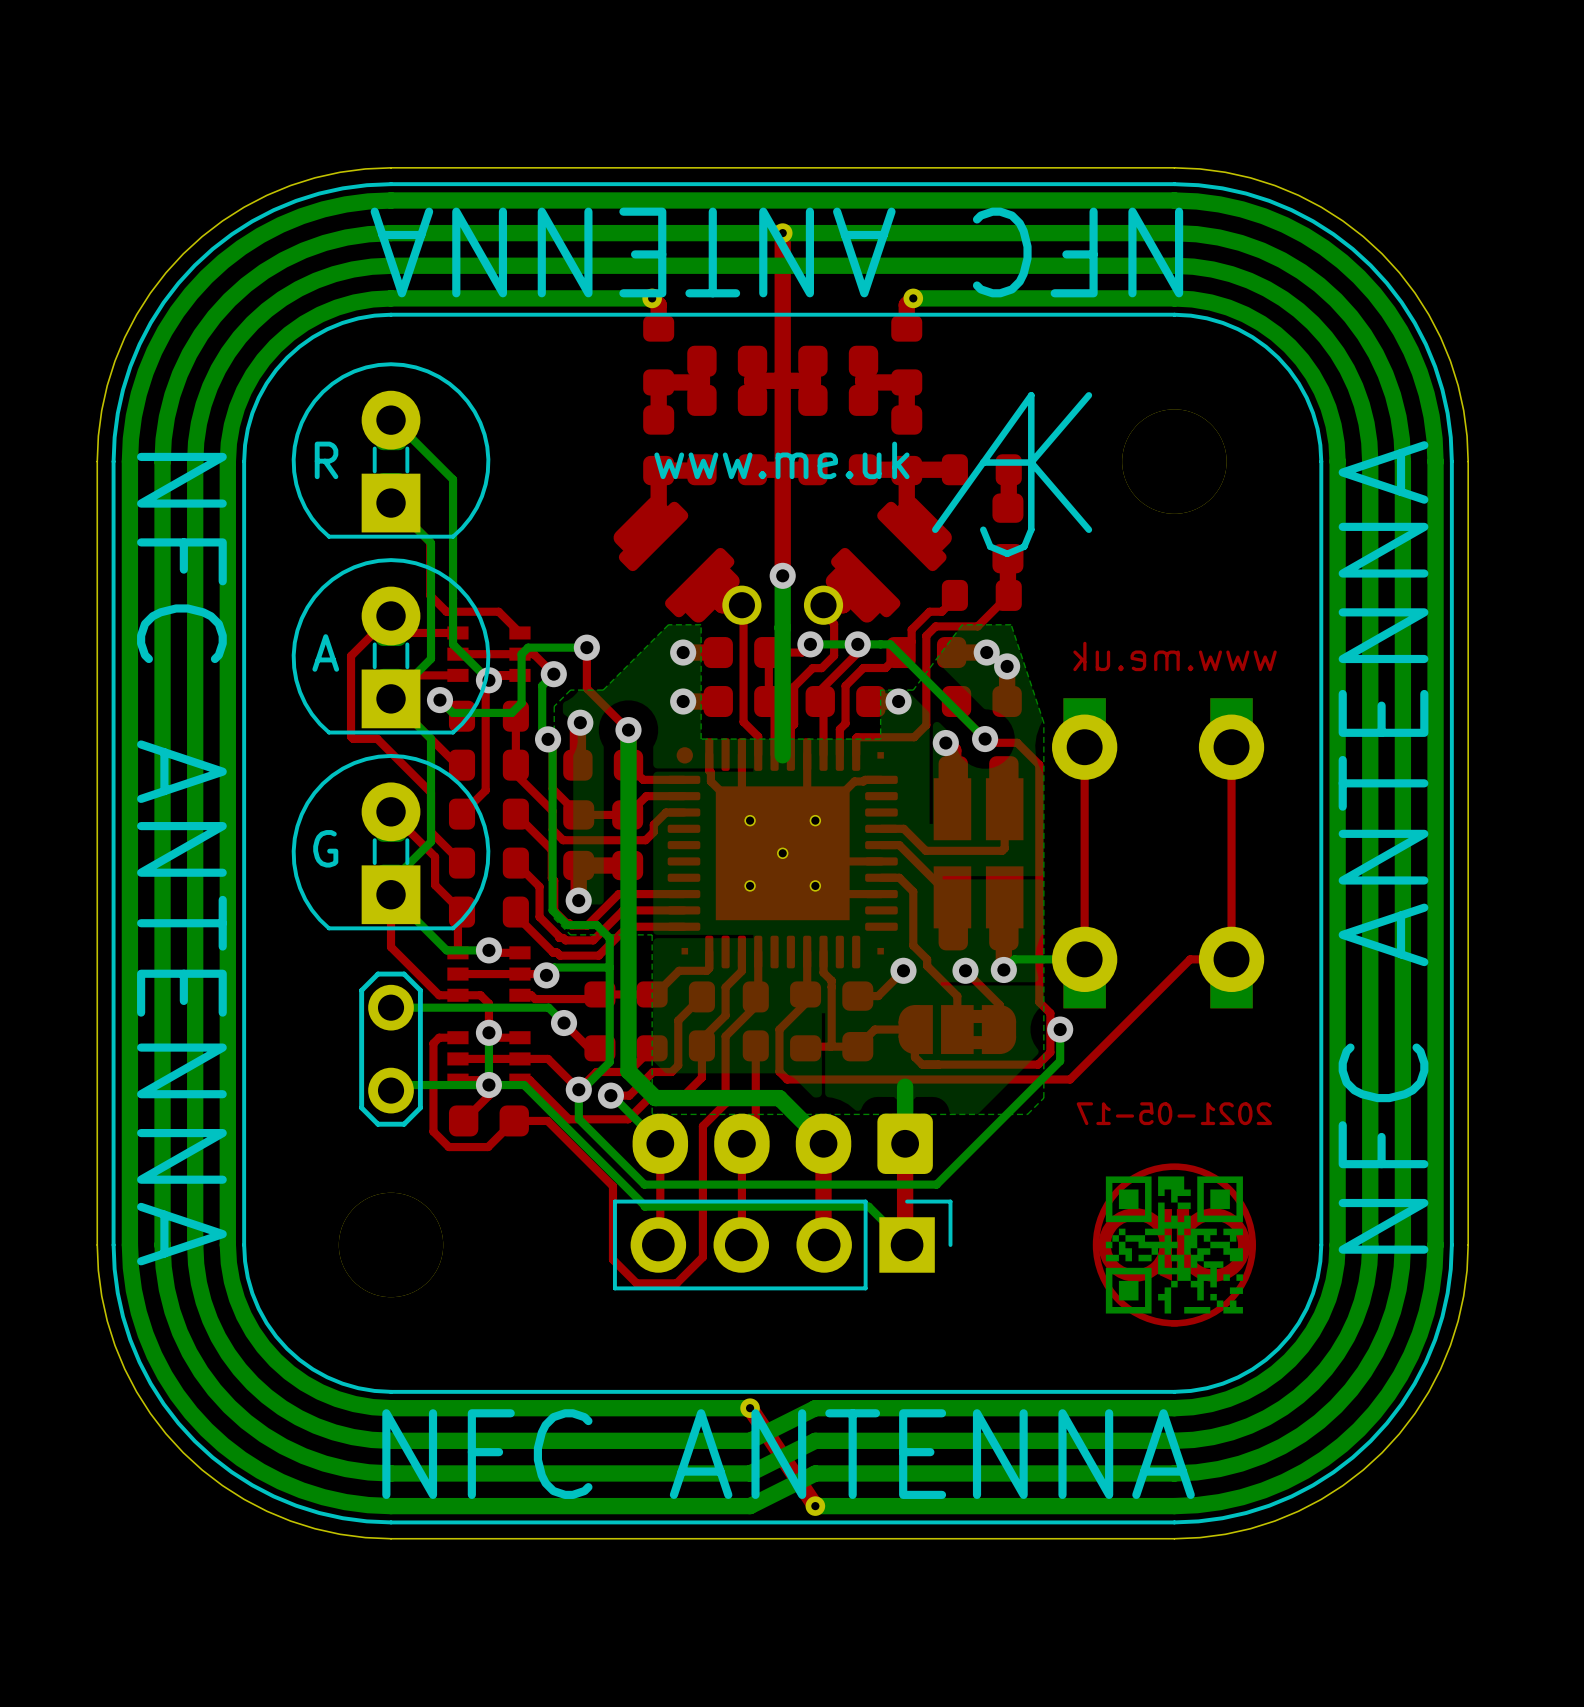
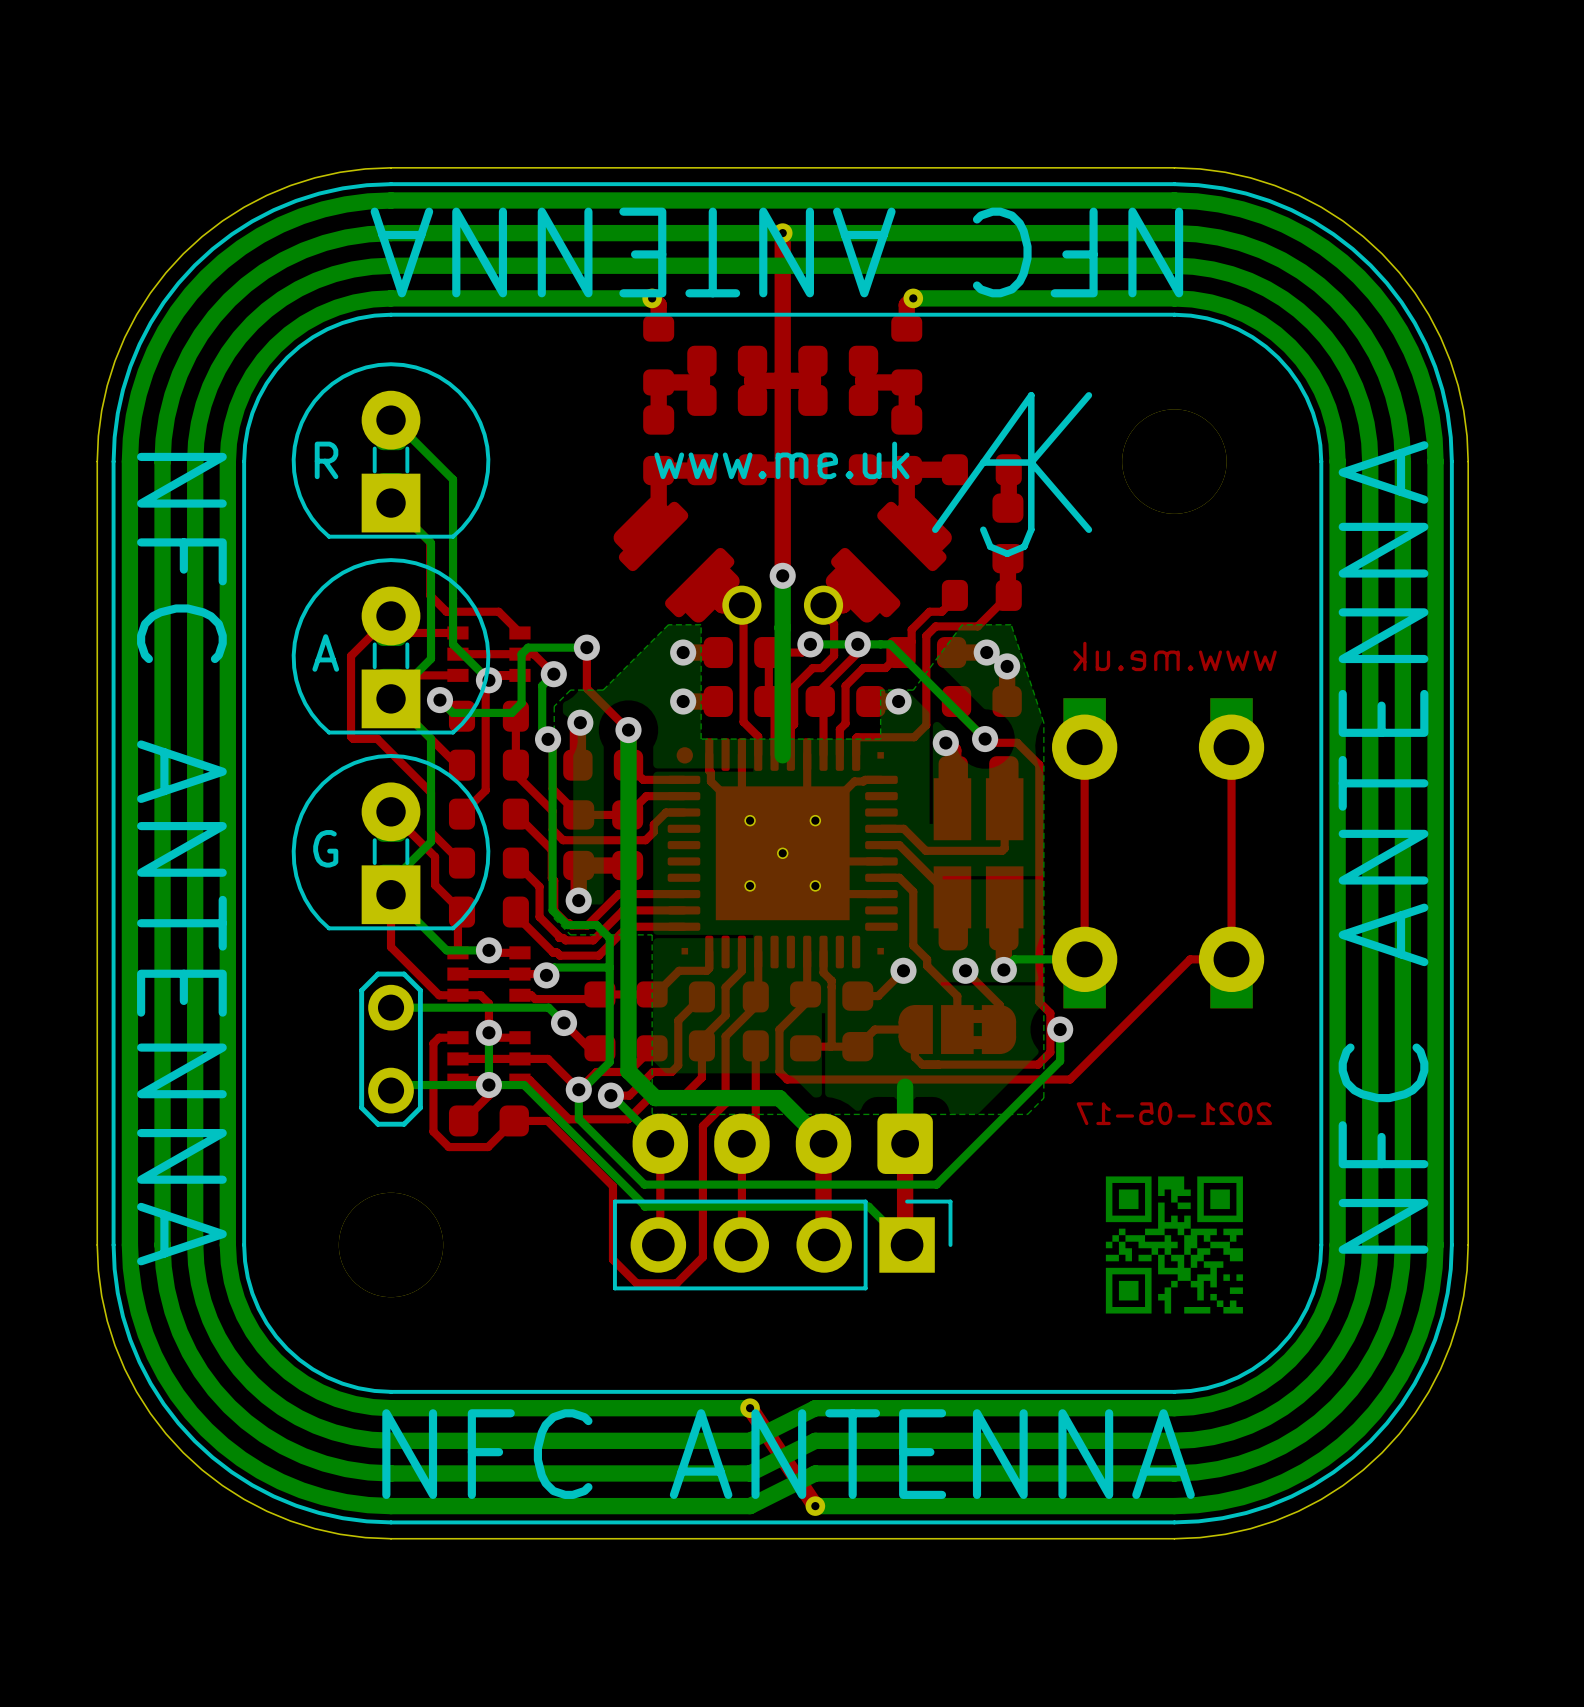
part: (1174, 1244) -> none

